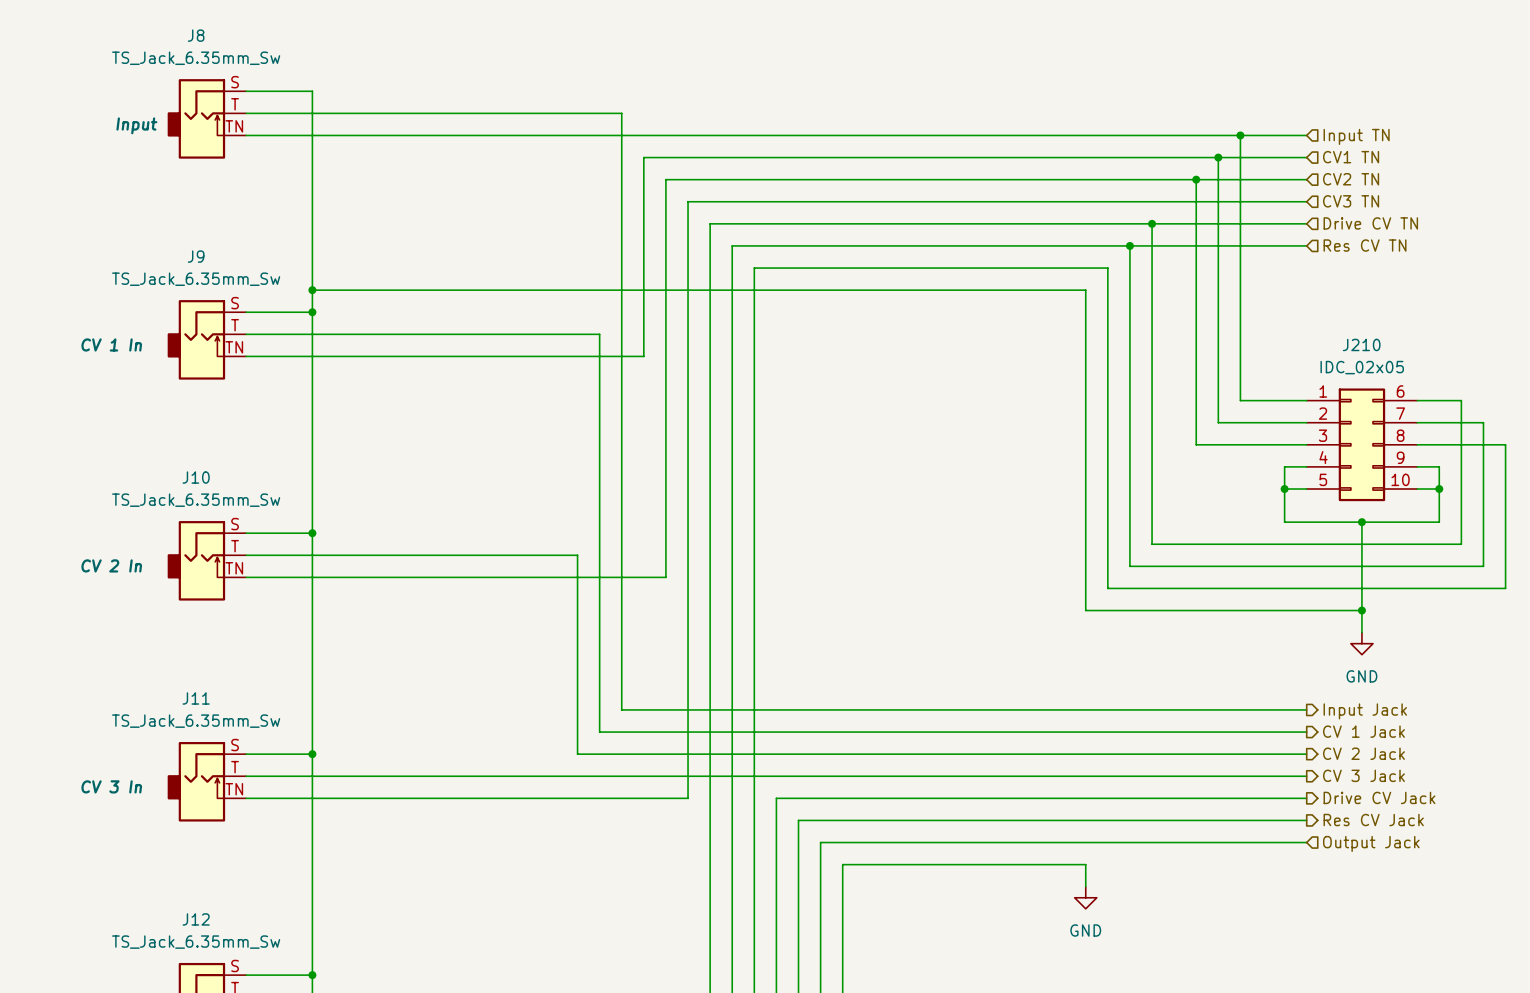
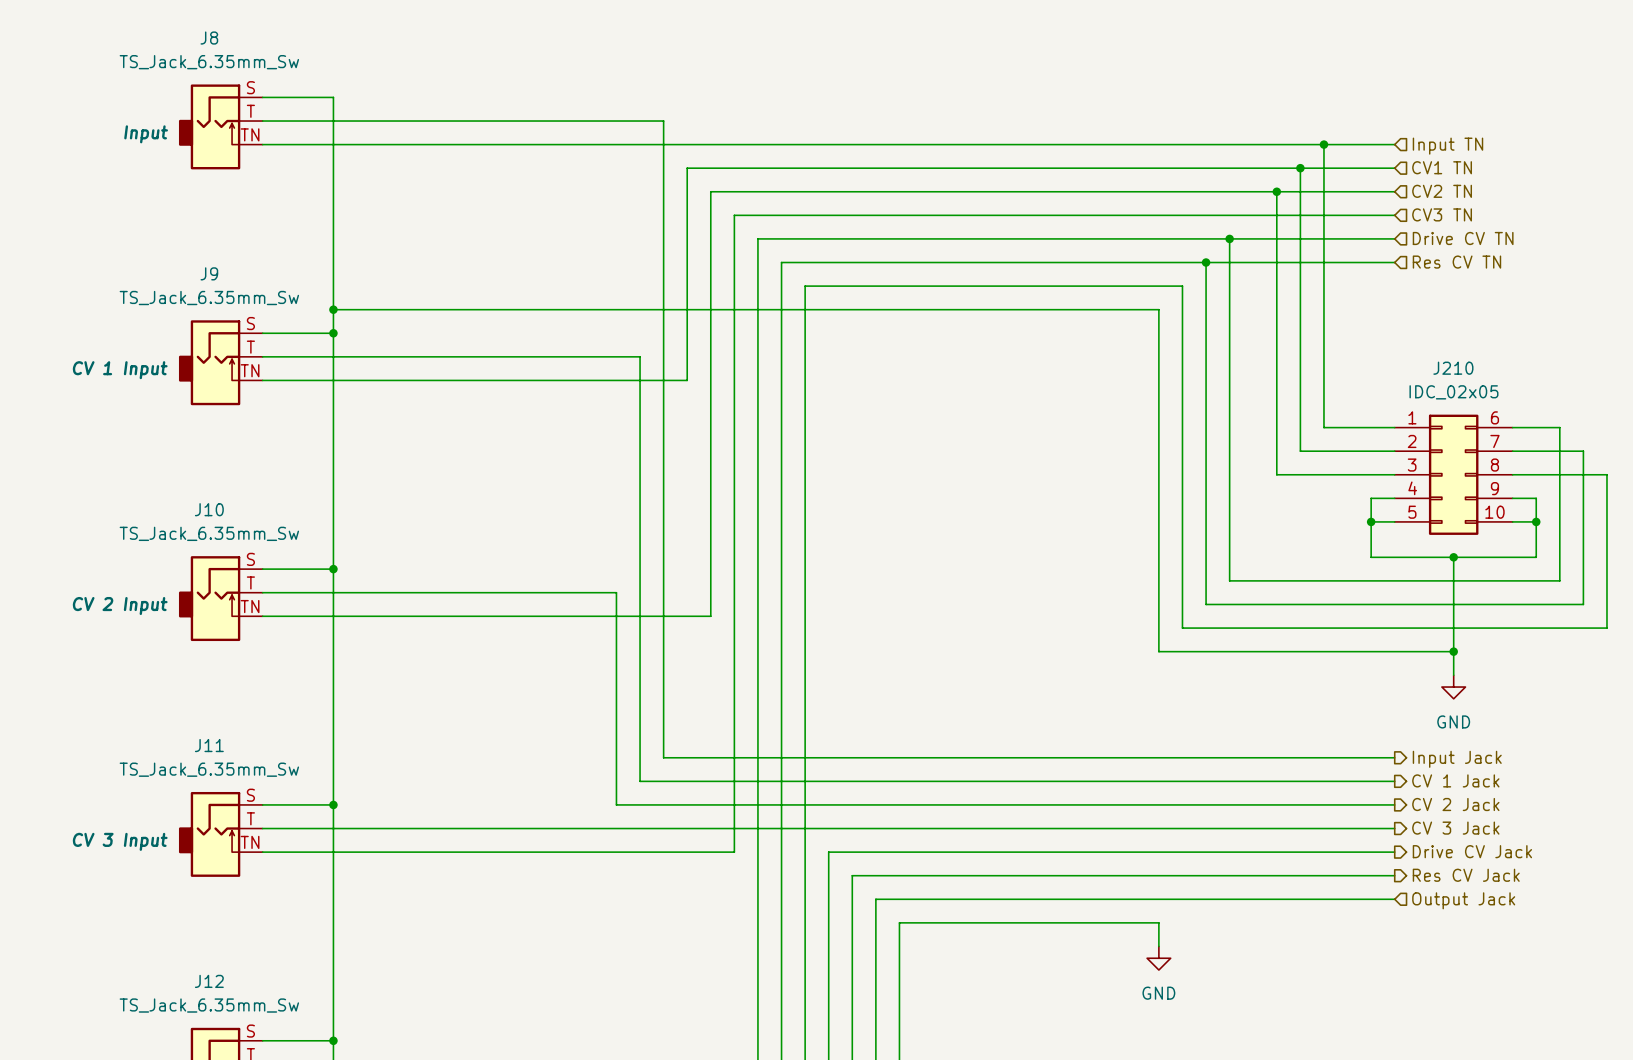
J9 text: CV 1 In (111, 344) -> CV 1 Input (120, 370)
J10 text: CV 2 In (111, 565) -> CV 2 Input (120, 606)
J11 text: CV 3 In (111, 786) -> CV 3 Input (120, 841)

